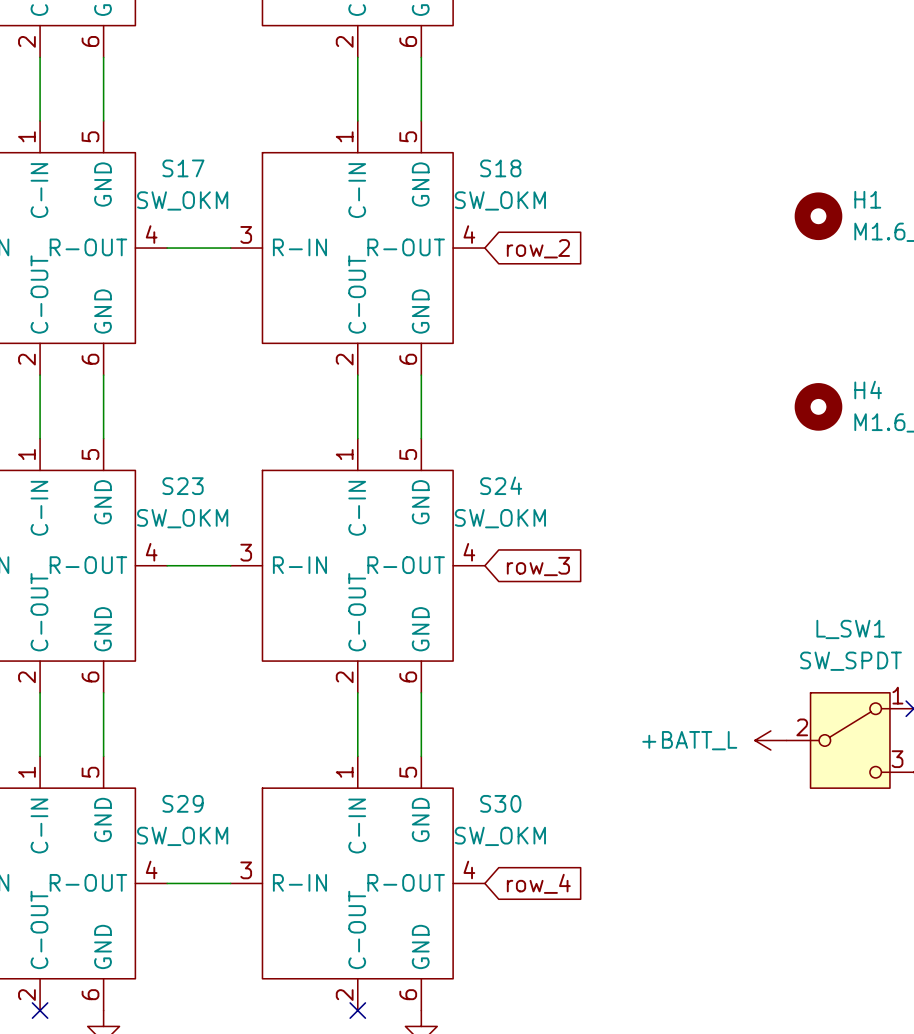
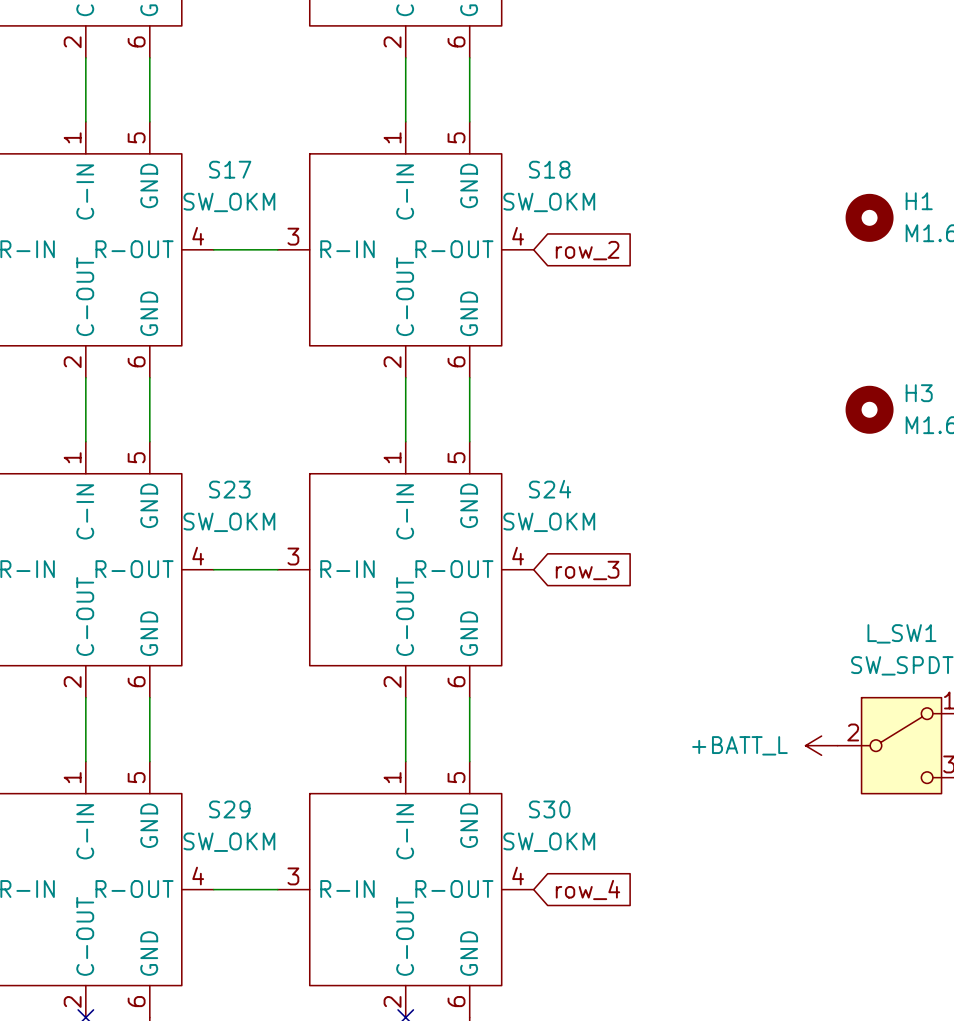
H4 name: H4 (868, 390) -> H3 (919, 393)

